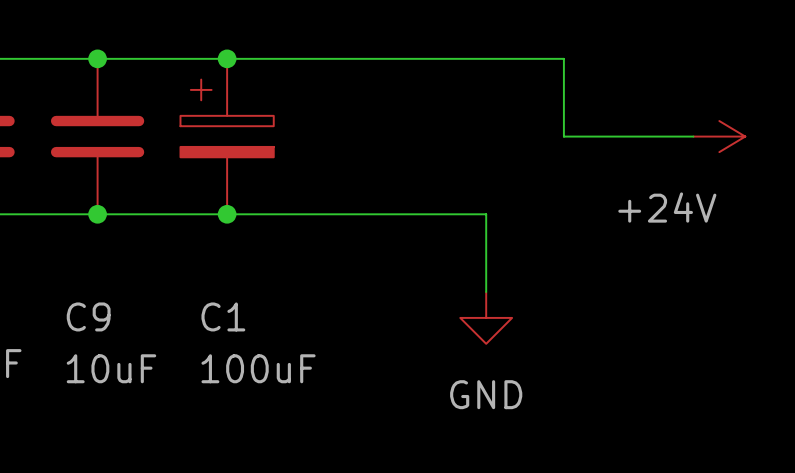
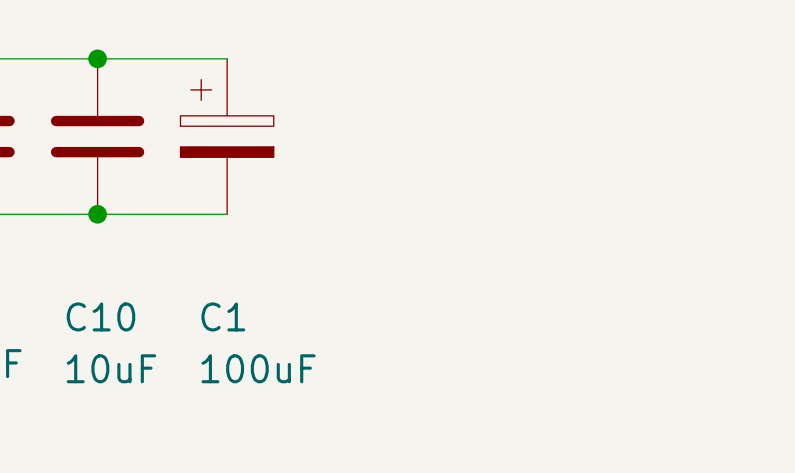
wire: (227, 58) (563, 58) (563, 136) (693, 136) -> none
junction: (227, 58) -> none
power symbol: +24V (719, 136) -> none
wire: (227, 214) (486, 214) (486, 292) -> none
junction: (227, 214) -> none
C9 name: C9 (88, 316) -> C10 (100, 316)
power symbol: GND (486, 317) -> none

